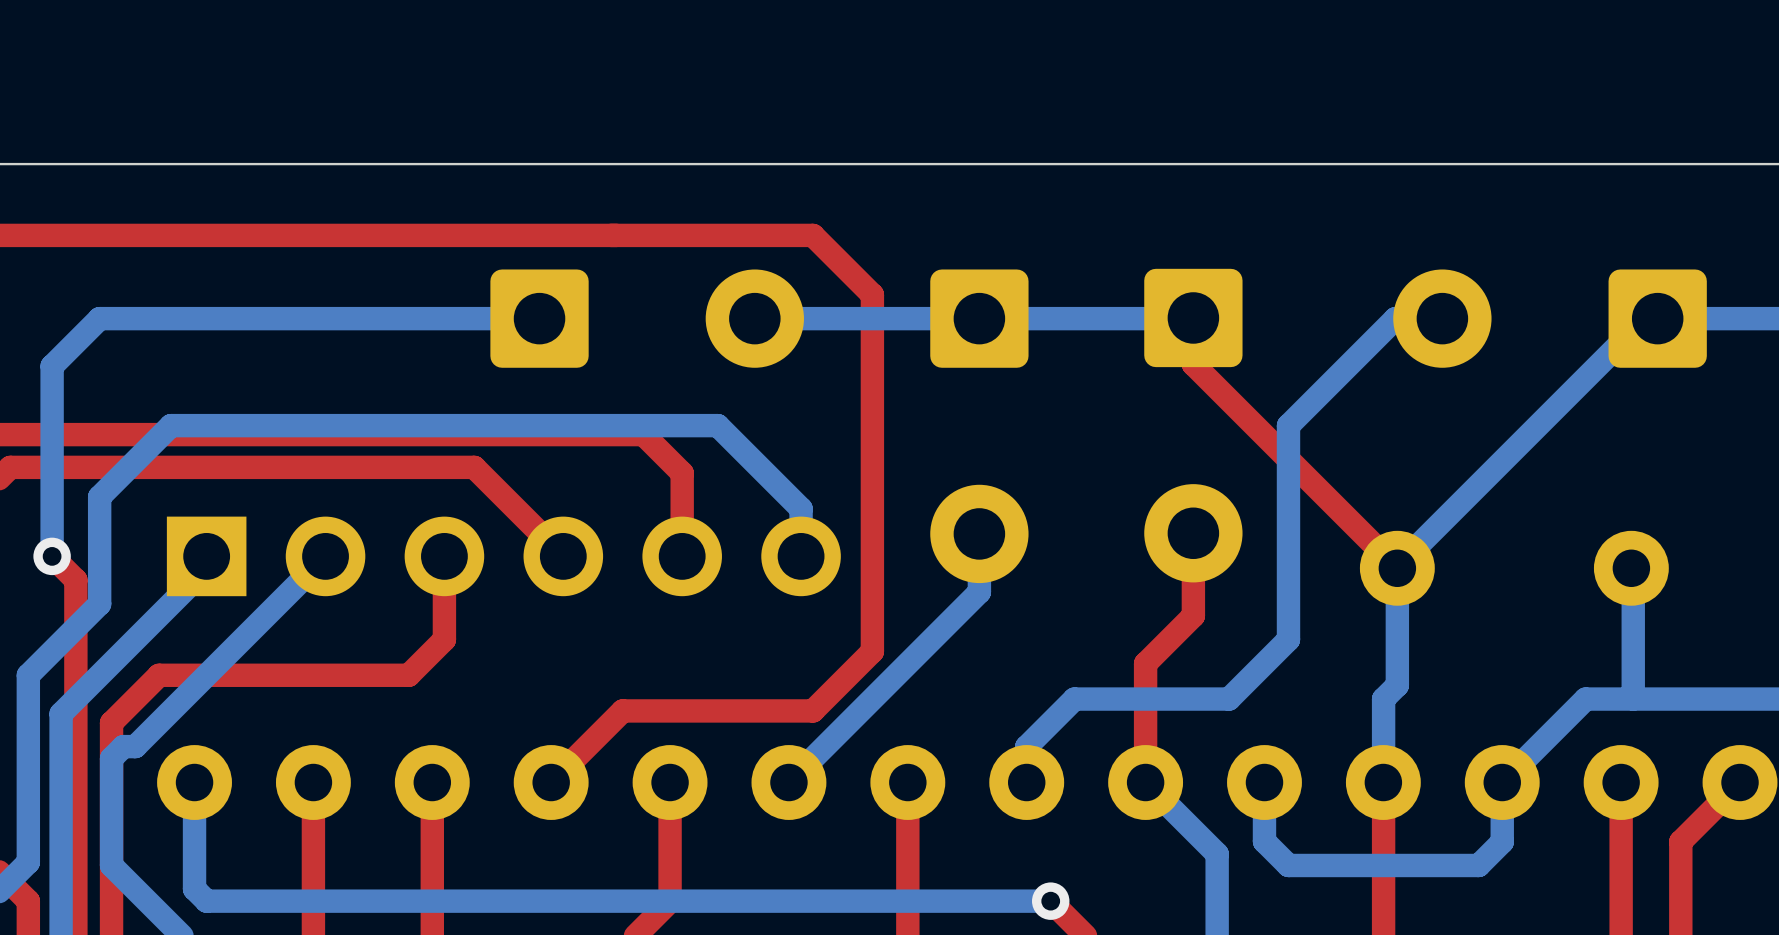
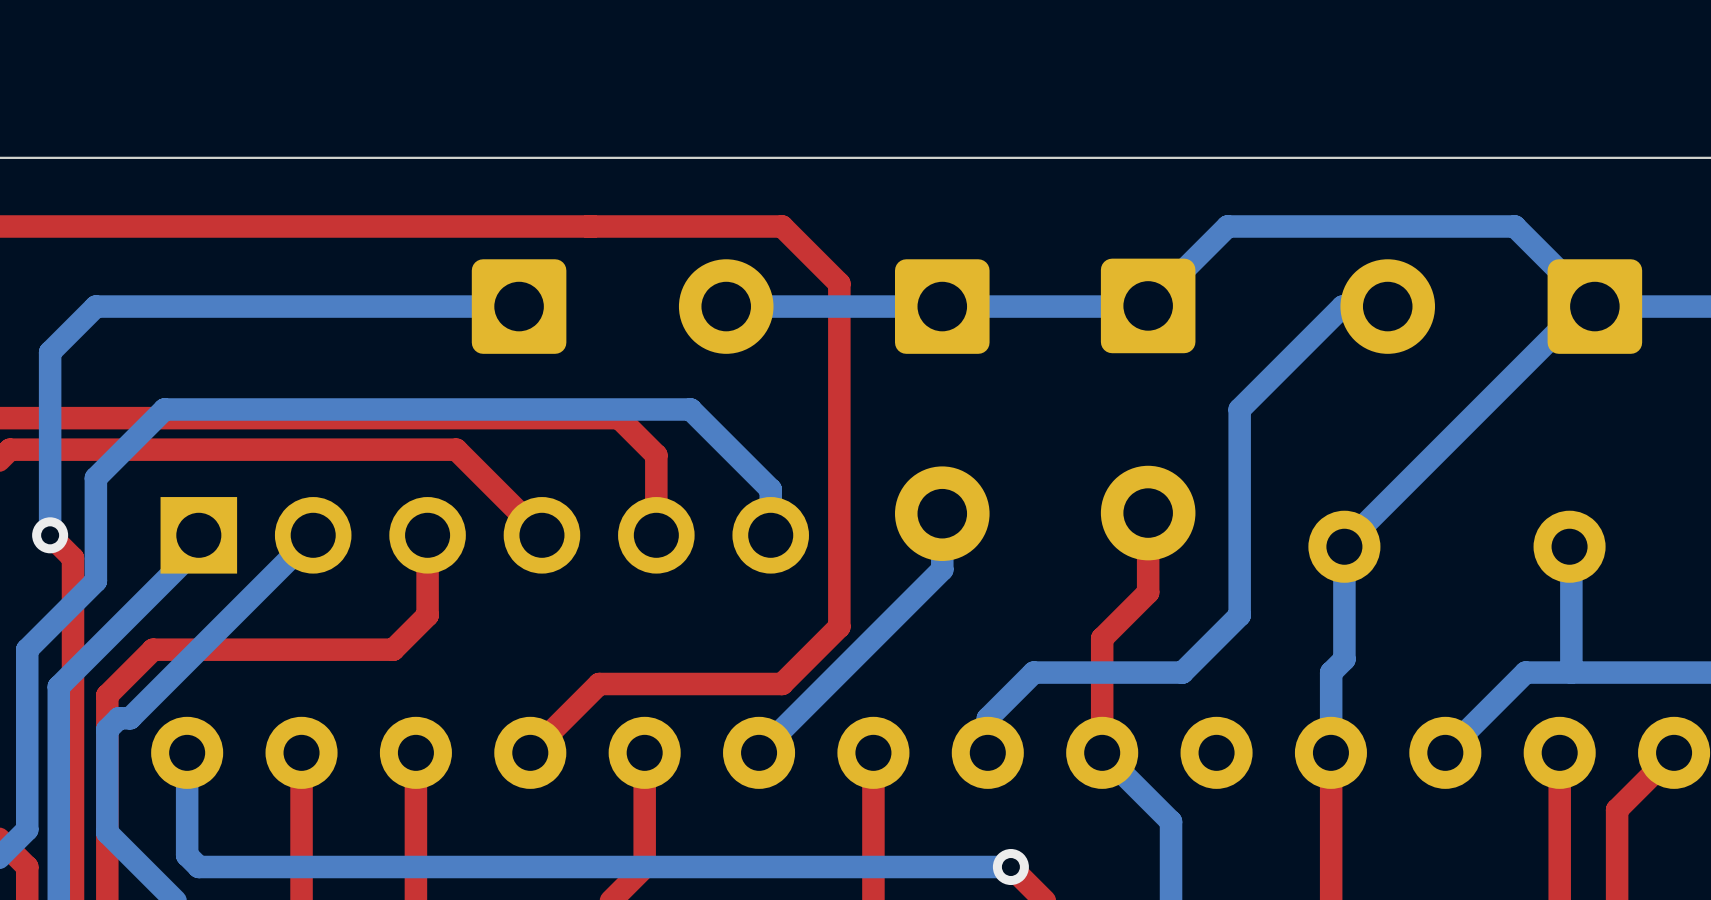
bottom track: none -> (1148, 305) (1227, 226) (1514, 226) (1594, 306)
top track: (1193, 317) (1193, 364) (1397, 568) -> none
bottom track: (1502, 782) (1502, 841) (1478, 865) (1288, 865) (1264, 841) (1264, 782) -> none

